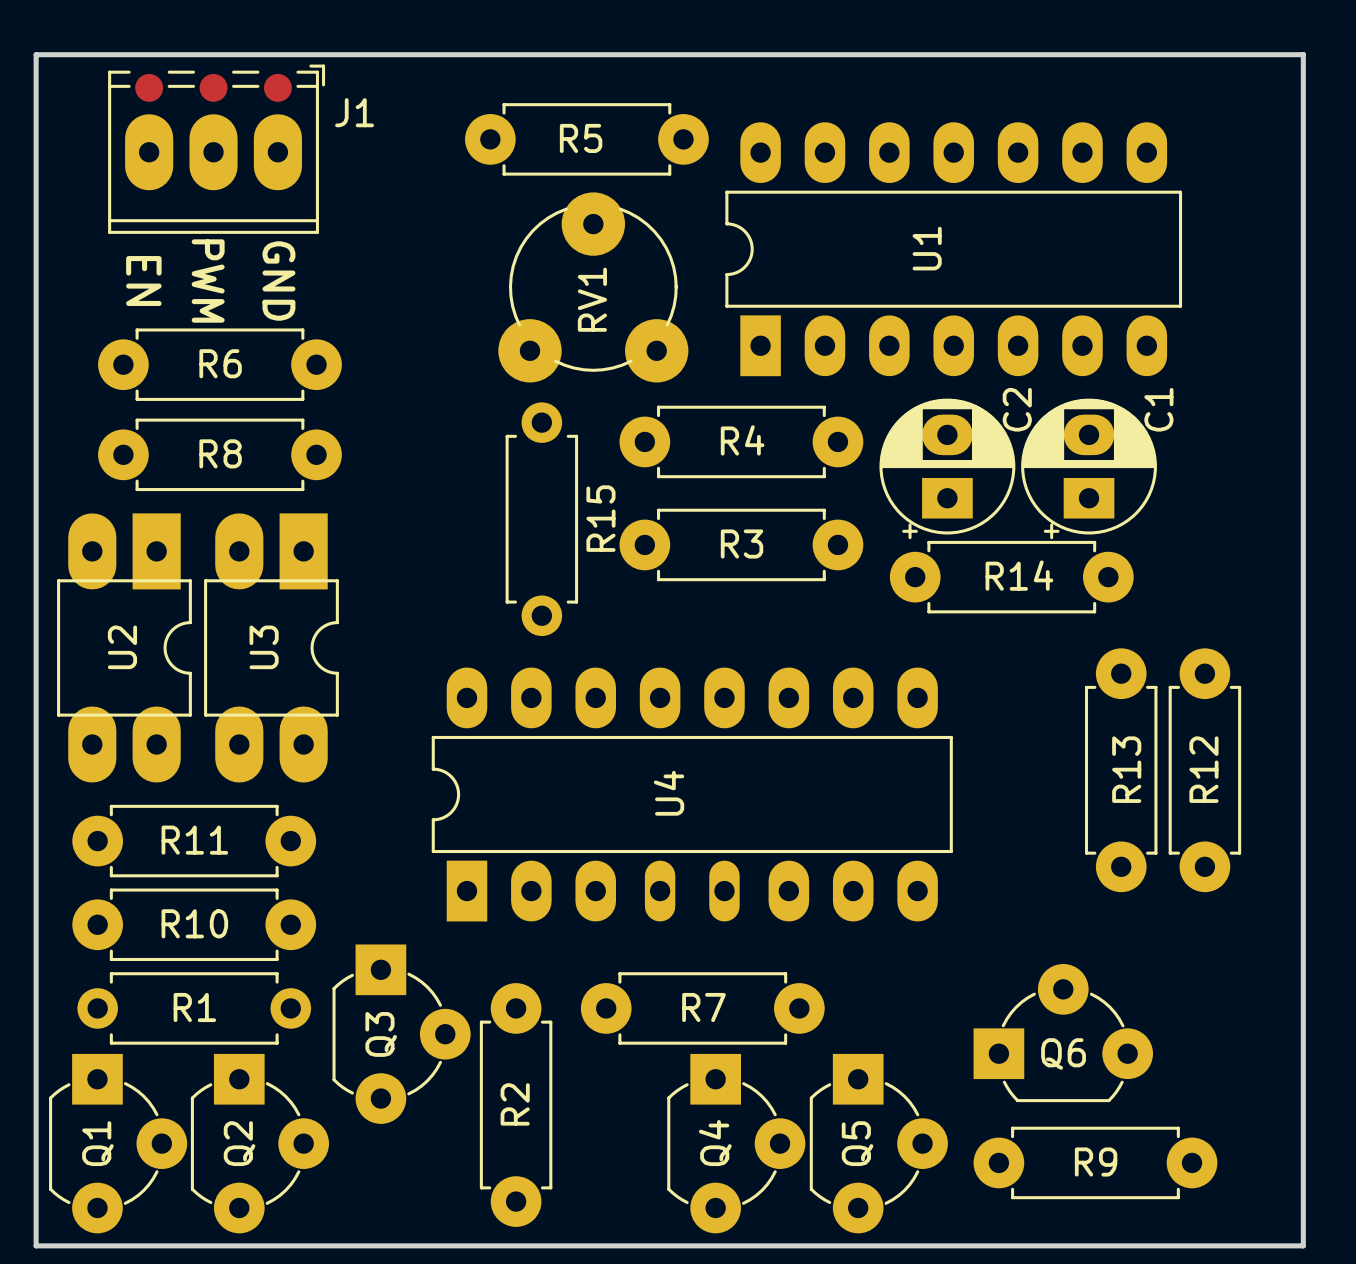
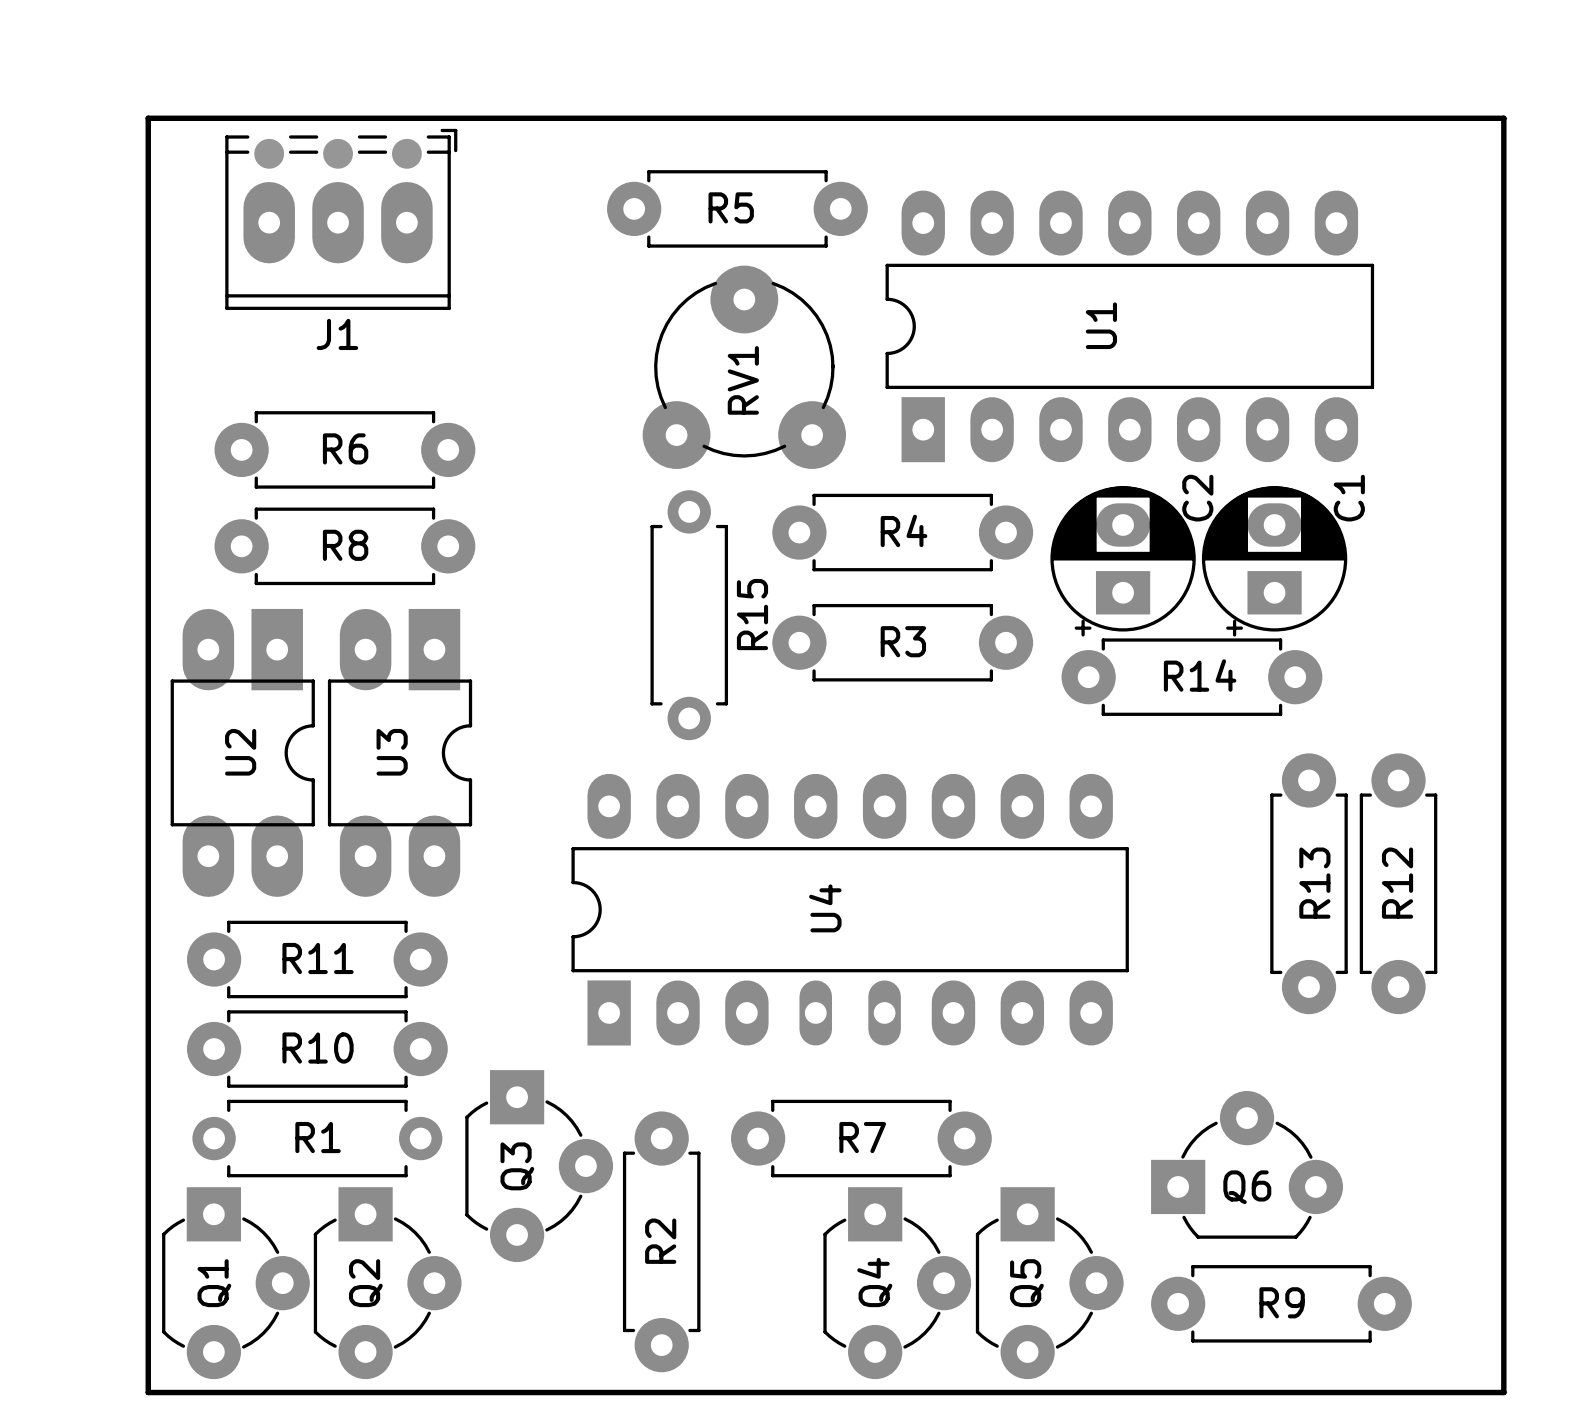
J1 name position: J1 (354, 112) -> J1 (337, 334)
text: EN (143, 281) -> none
text: PWM (208, 281) -> none
text: GND (278, 281) -> none

